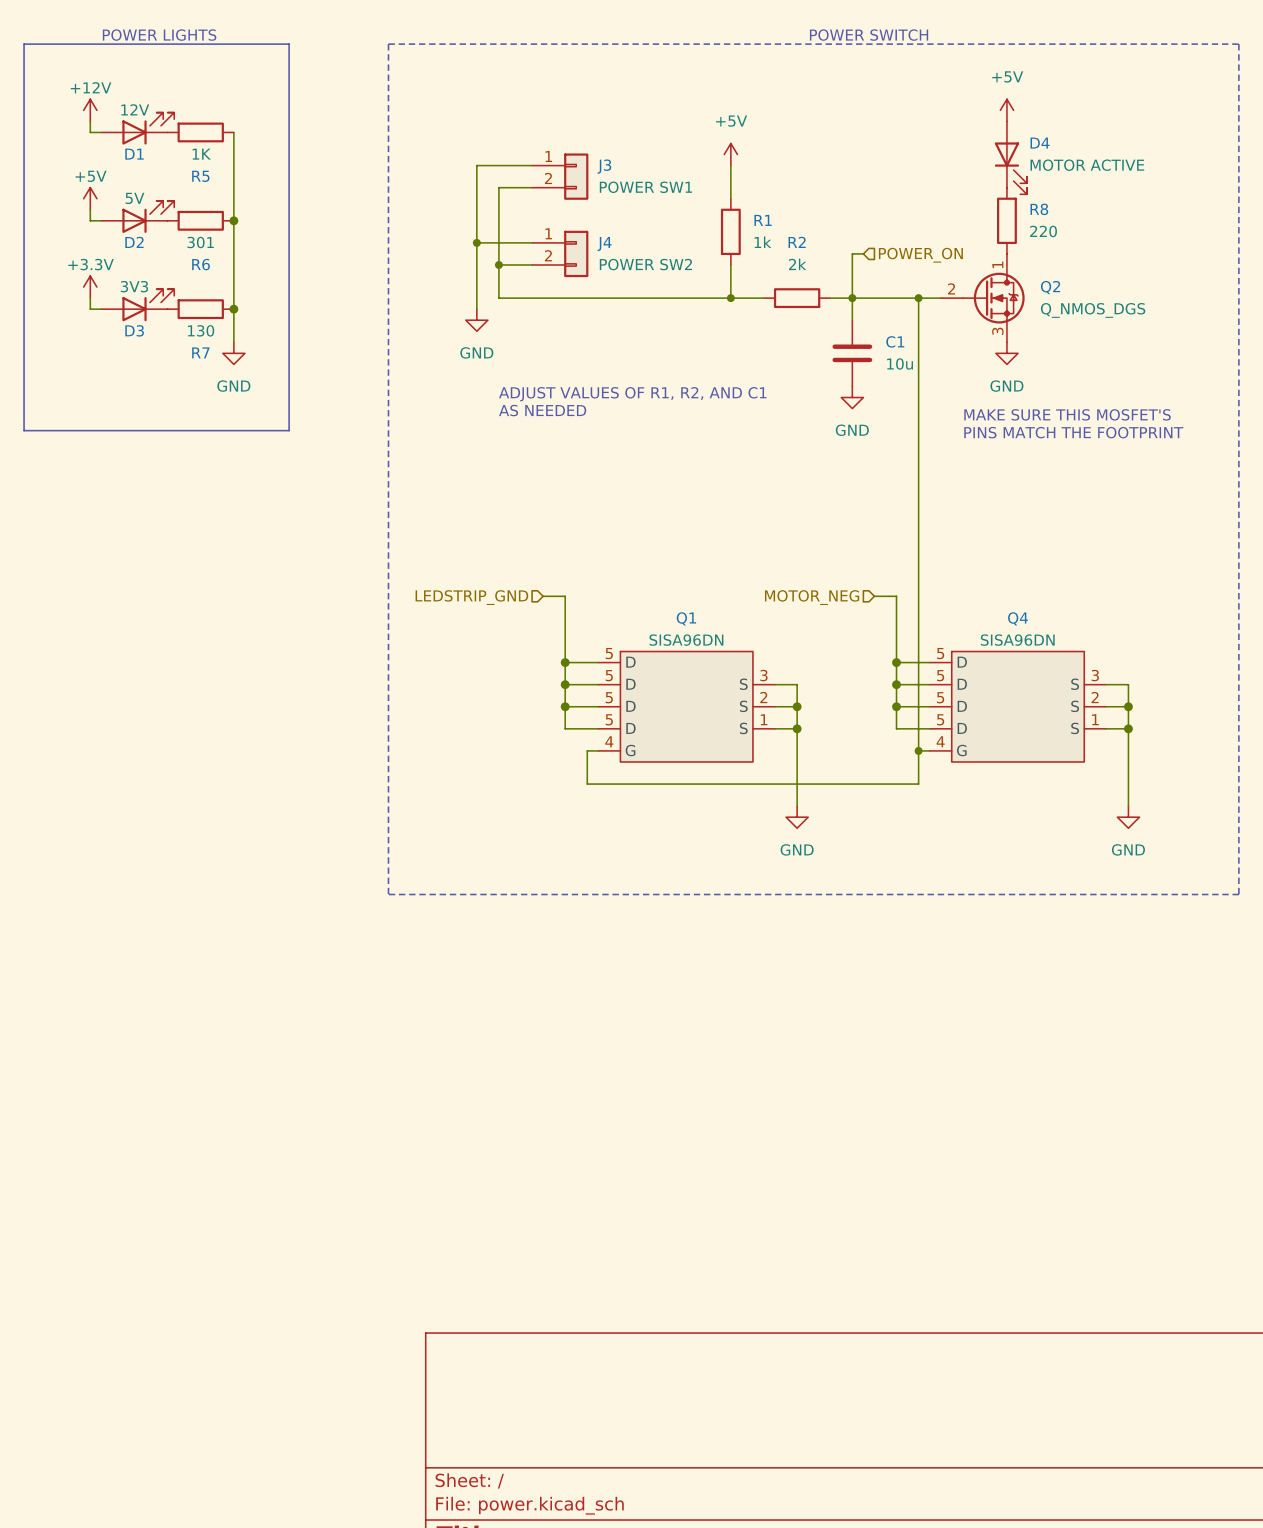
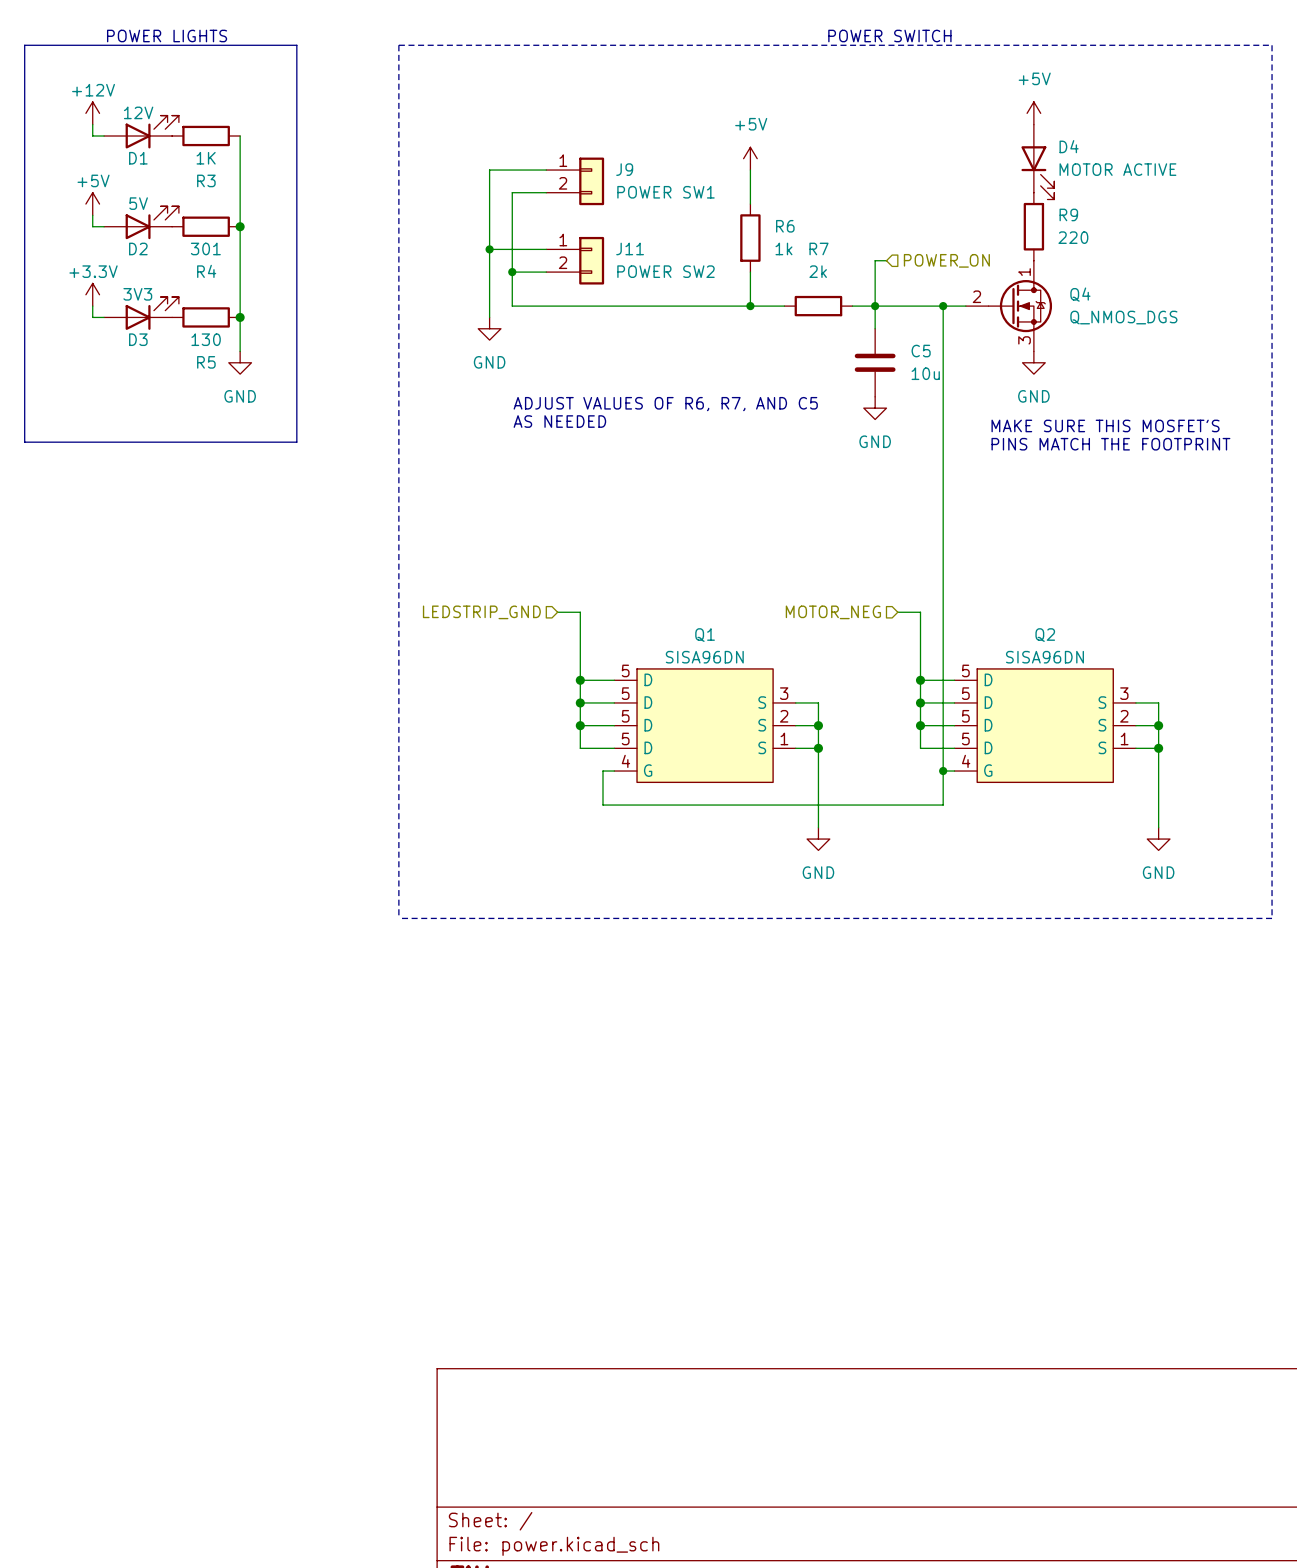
J3 name: J3 (604, 166) -> J9 (624, 169)
R5 name: R5 (200, 176) -> R3 (206, 180)
R8 name: R8 (1039, 209) -> R9 (1068, 214)
R1 name: R1 (763, 220) -> R6 (785, 226)
R2 name: R2 (797, 242) -> R7 (818, 248)
J4 name: J4 (604, 244) -> J11 (630, 248)
R6 name: R6 (201, 264) -> R4 (206, 271)
Q2 name: Q2 (1050, 287) -> Q4 (1080, 294)
C1 name: C1 (895, 341) -> C5 (921, 351)
R7 name: R7 (200, 352) -> R5 (206, 362)
text: ADJUST VALUES OF R1, R2, AND C1 (632, 394) -> ADJUST VALUES OF R6, R7, AND C5 (665, 404)
Q4 name: Q4 (1018, 618) -> Q2 (1045, 635)

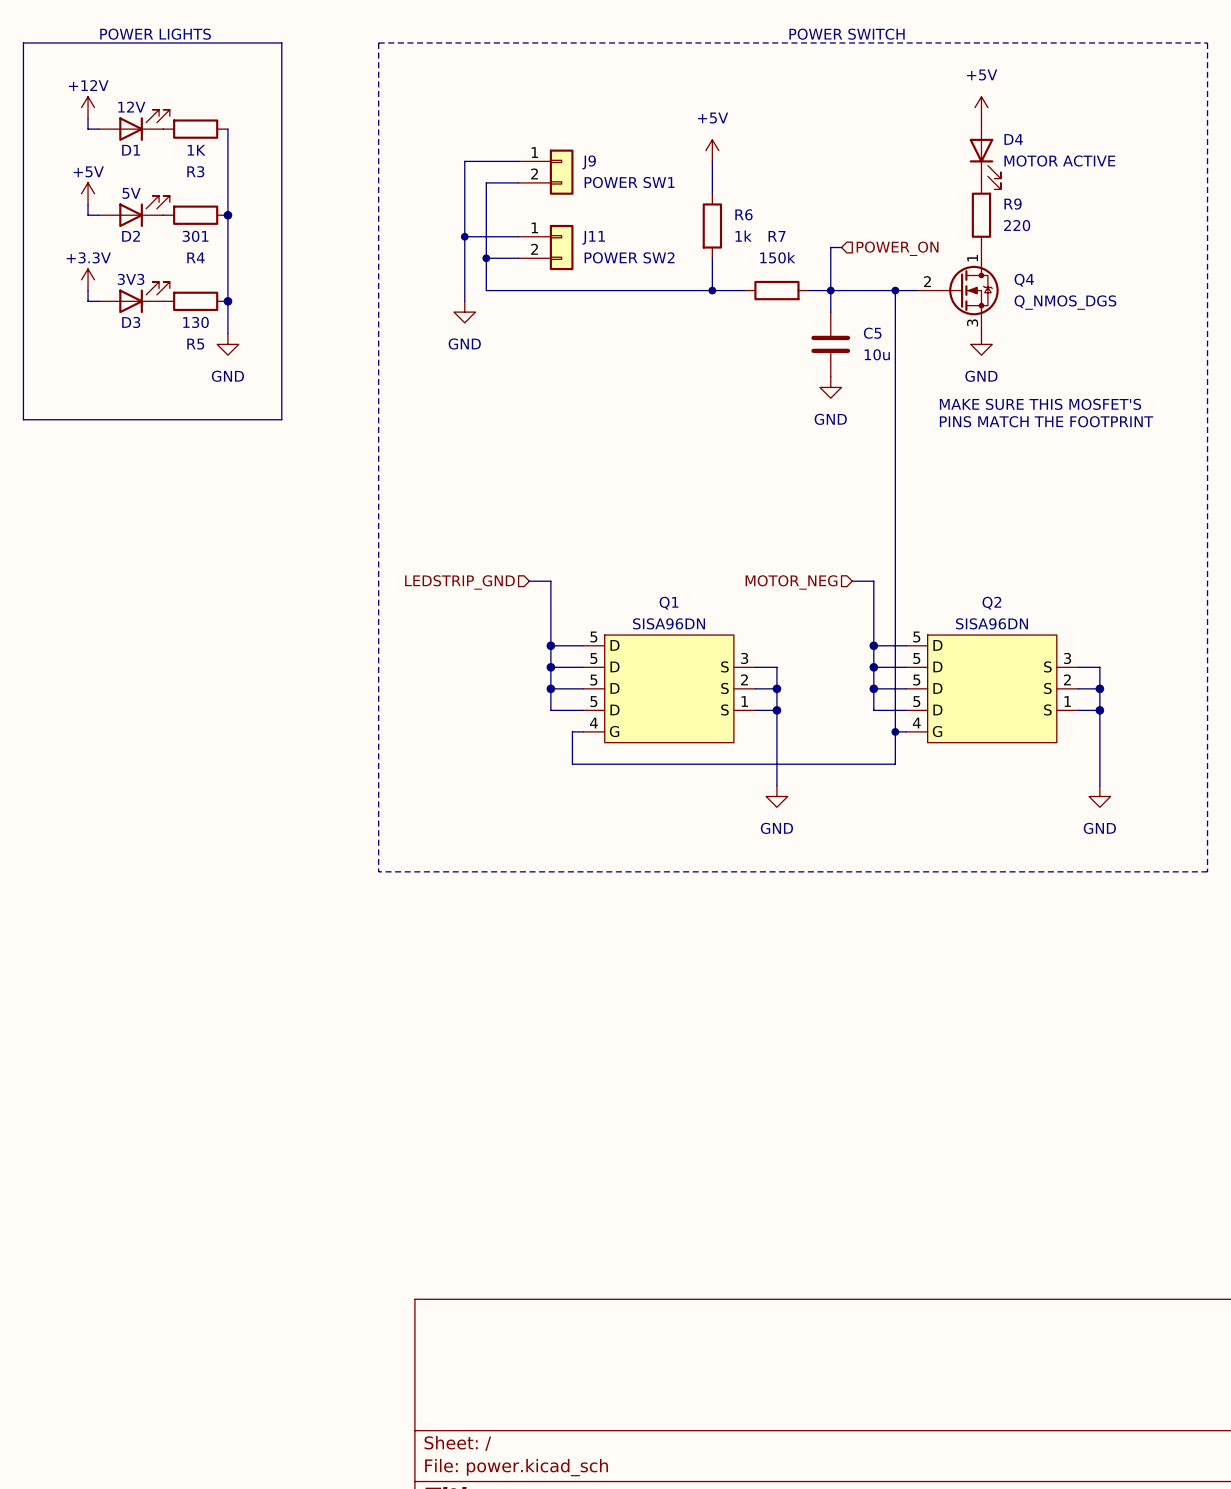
R7 value: 2k (818, 271) -> 150k (777, 257)
text: ADJUST VALUES OF R6, R7, AND C5 (665, 404) -> none
text: AS NEEDED (559, 421) -> none

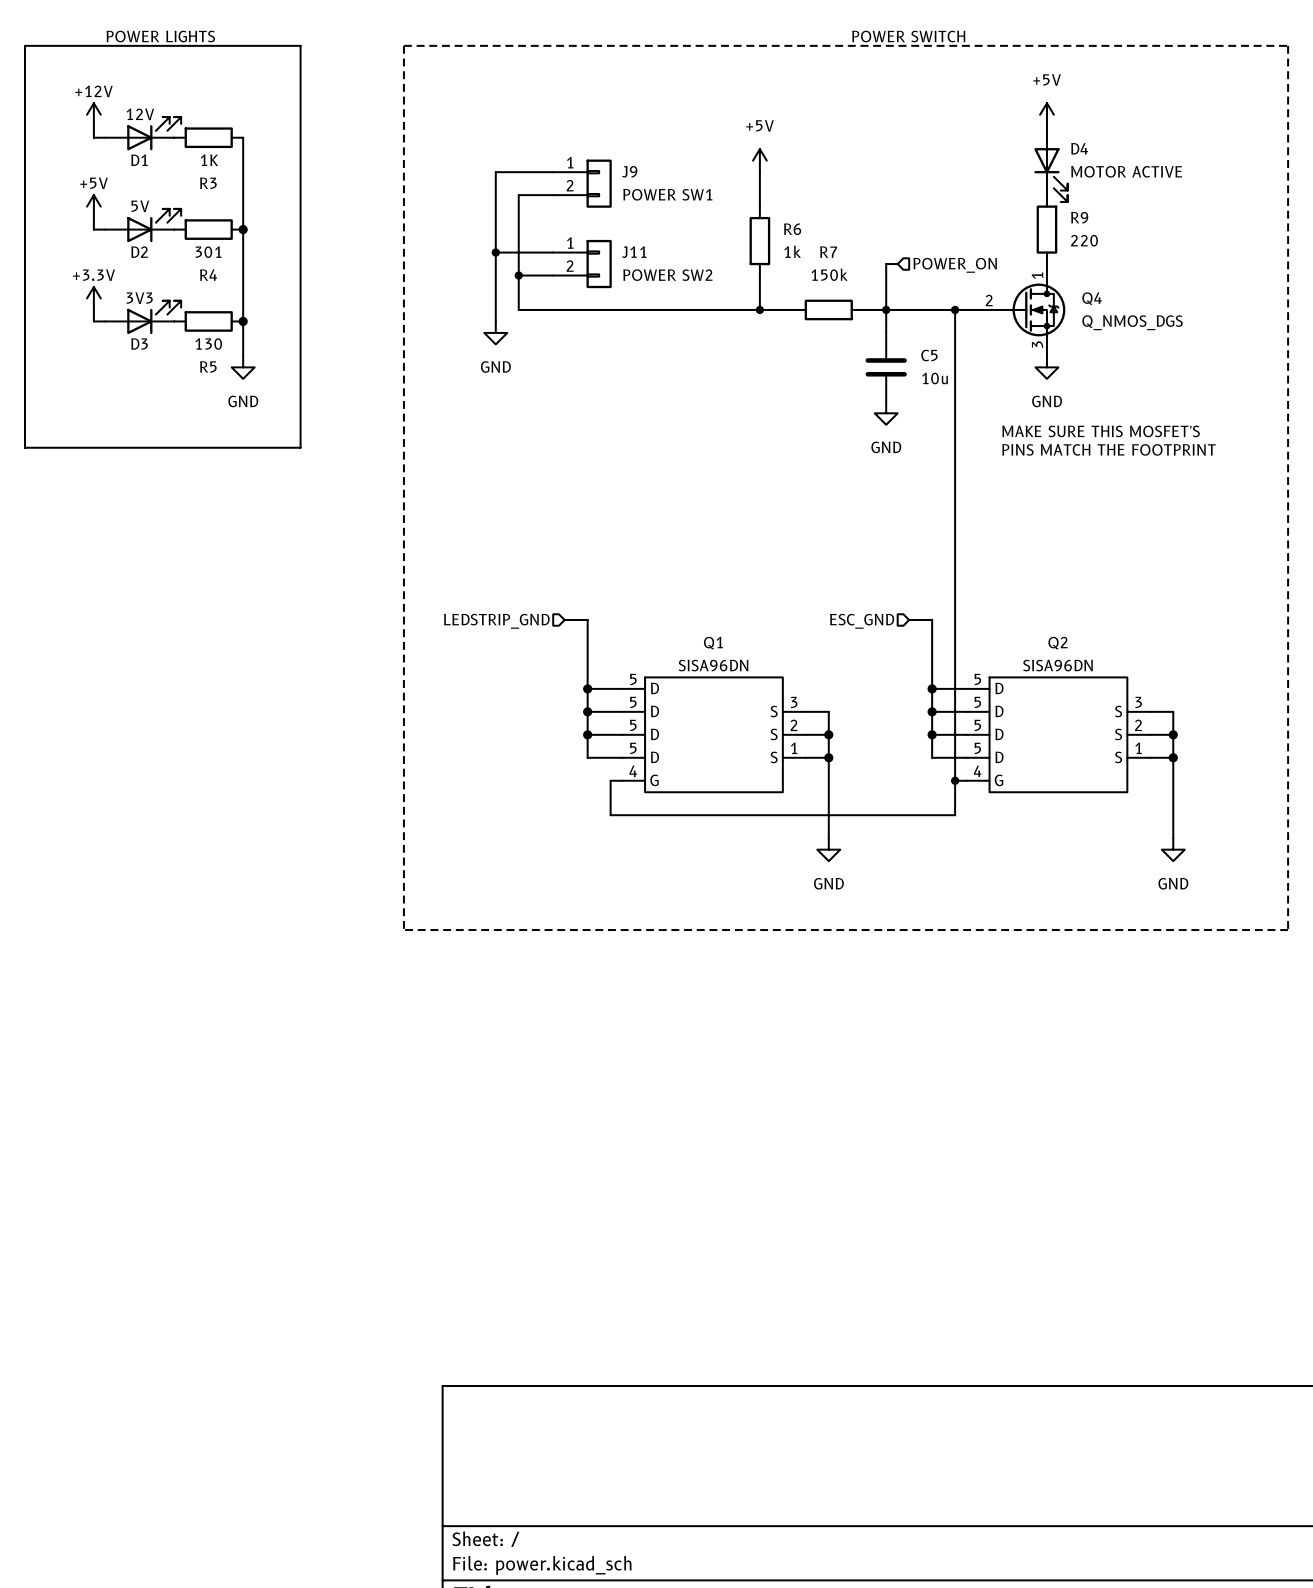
hierarchical label: MOTOR_NEG (791, 582) -> ESC_GND (862, 621)

